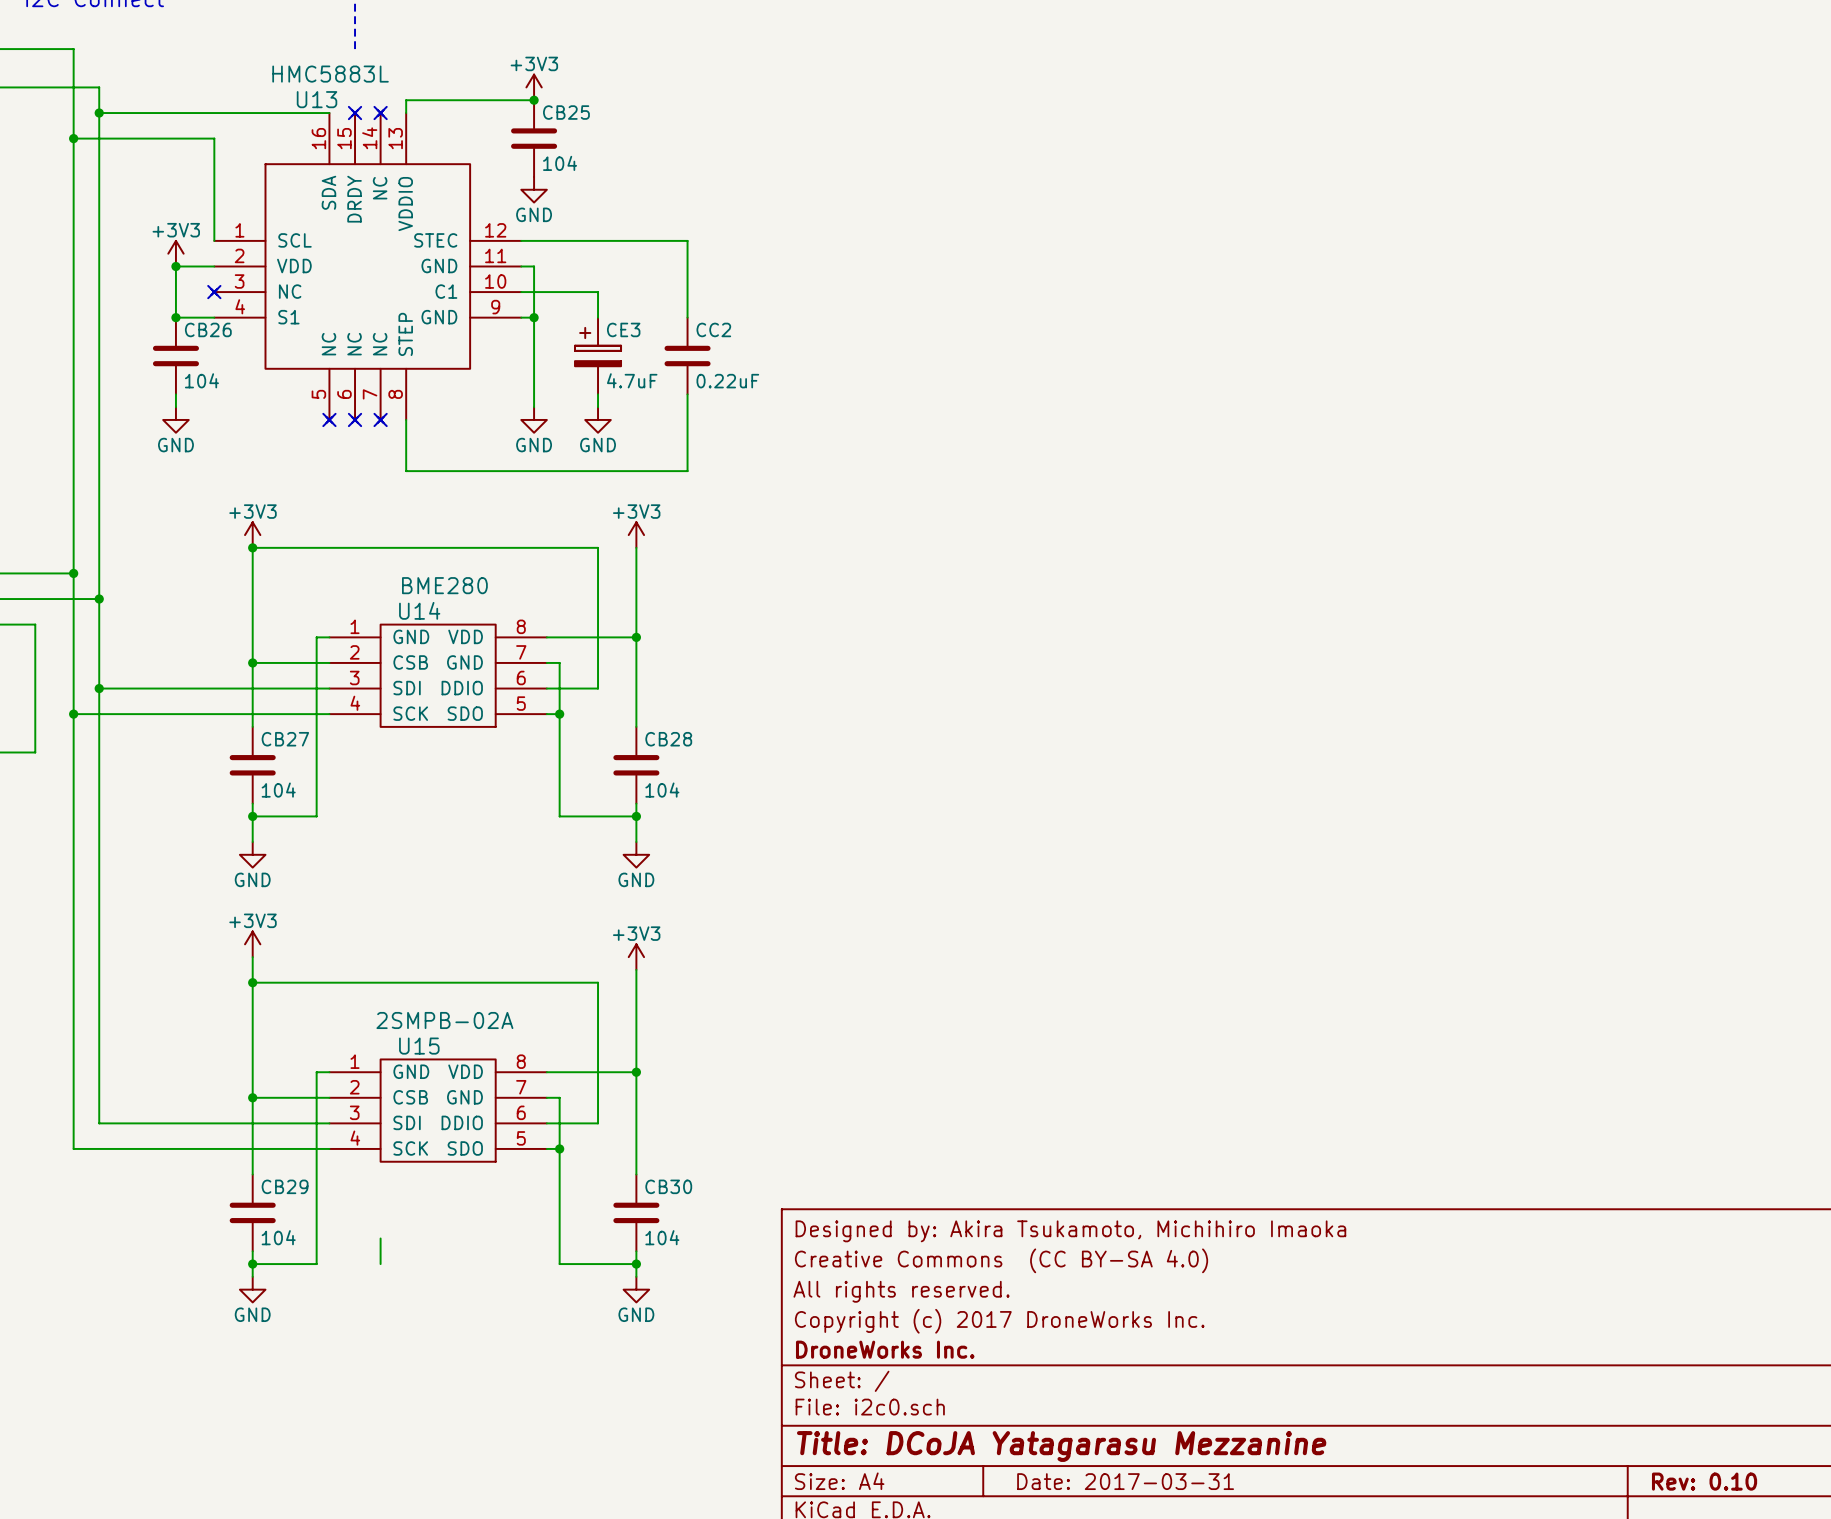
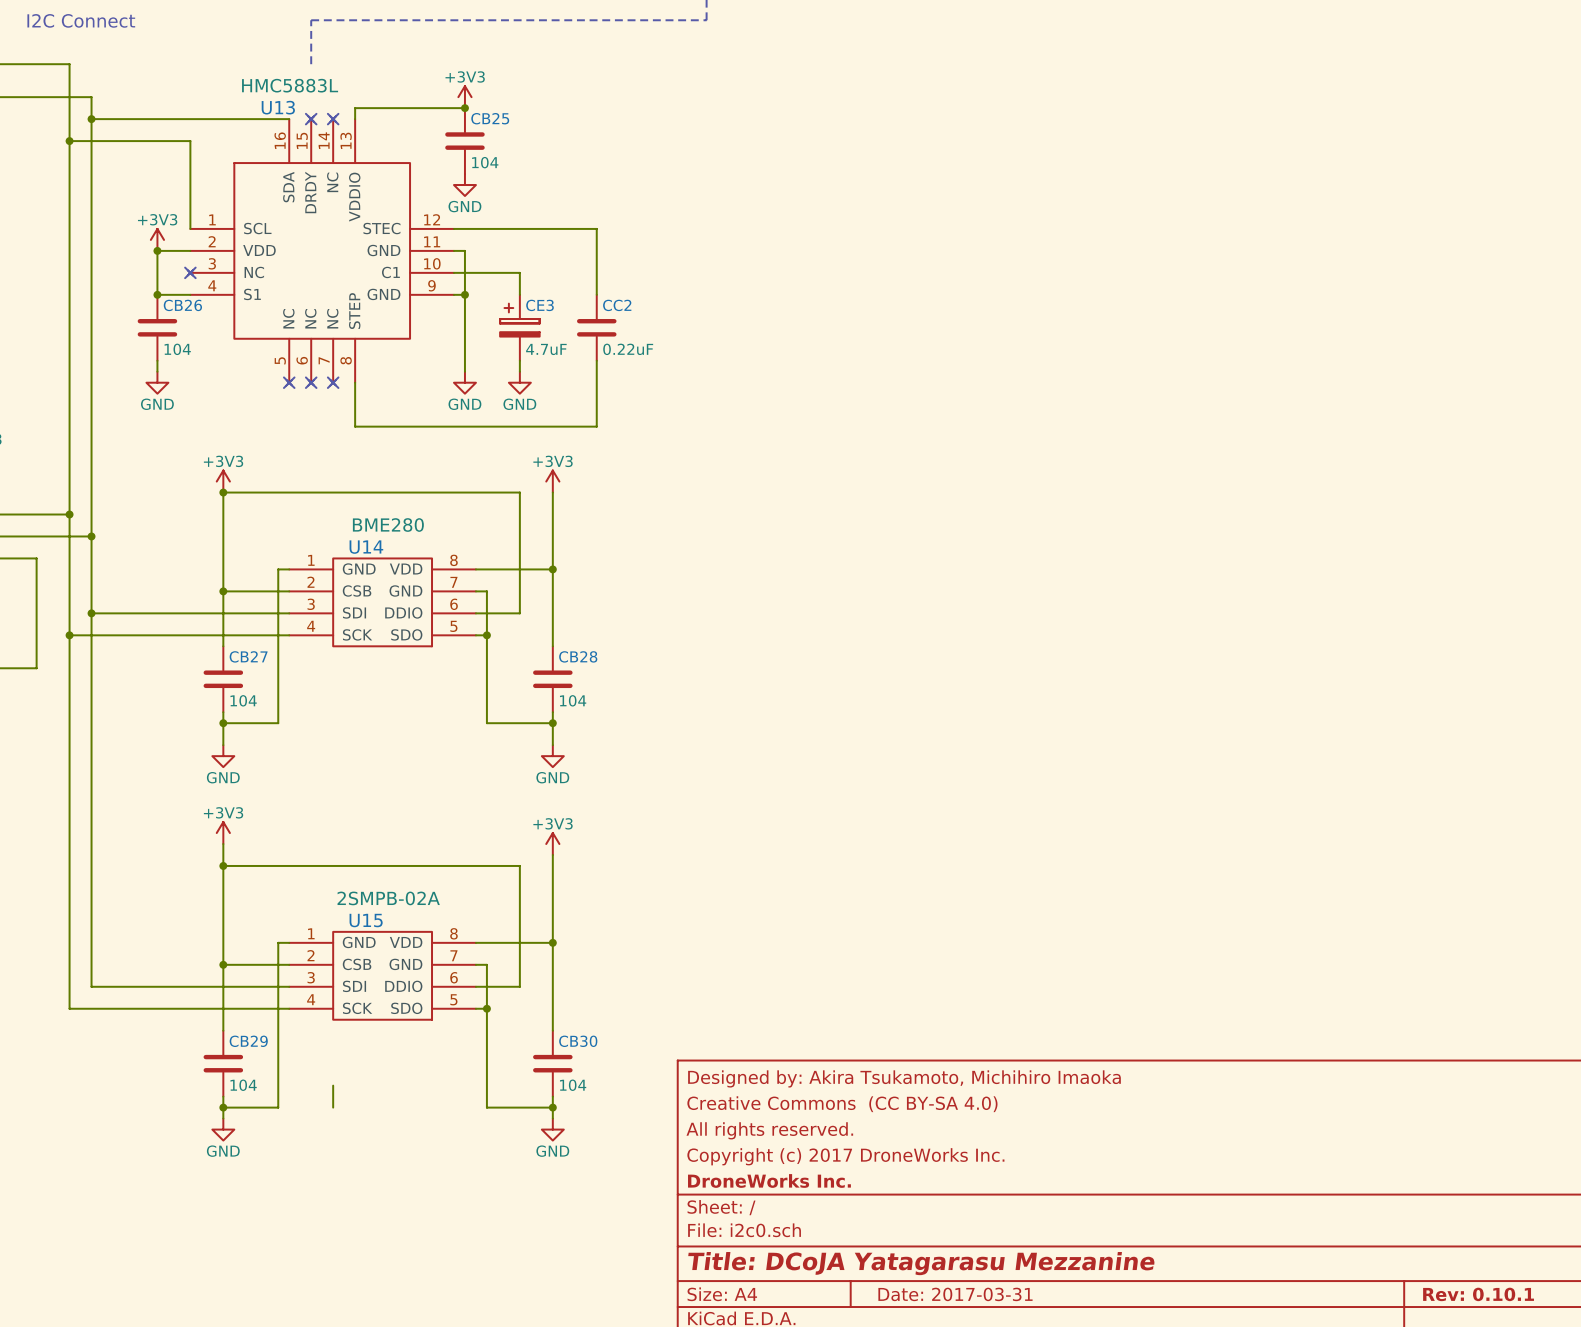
title block: Rev: 0.10 (1704, 1481) -> Rev: 0.10.1 (1478, 1294)

